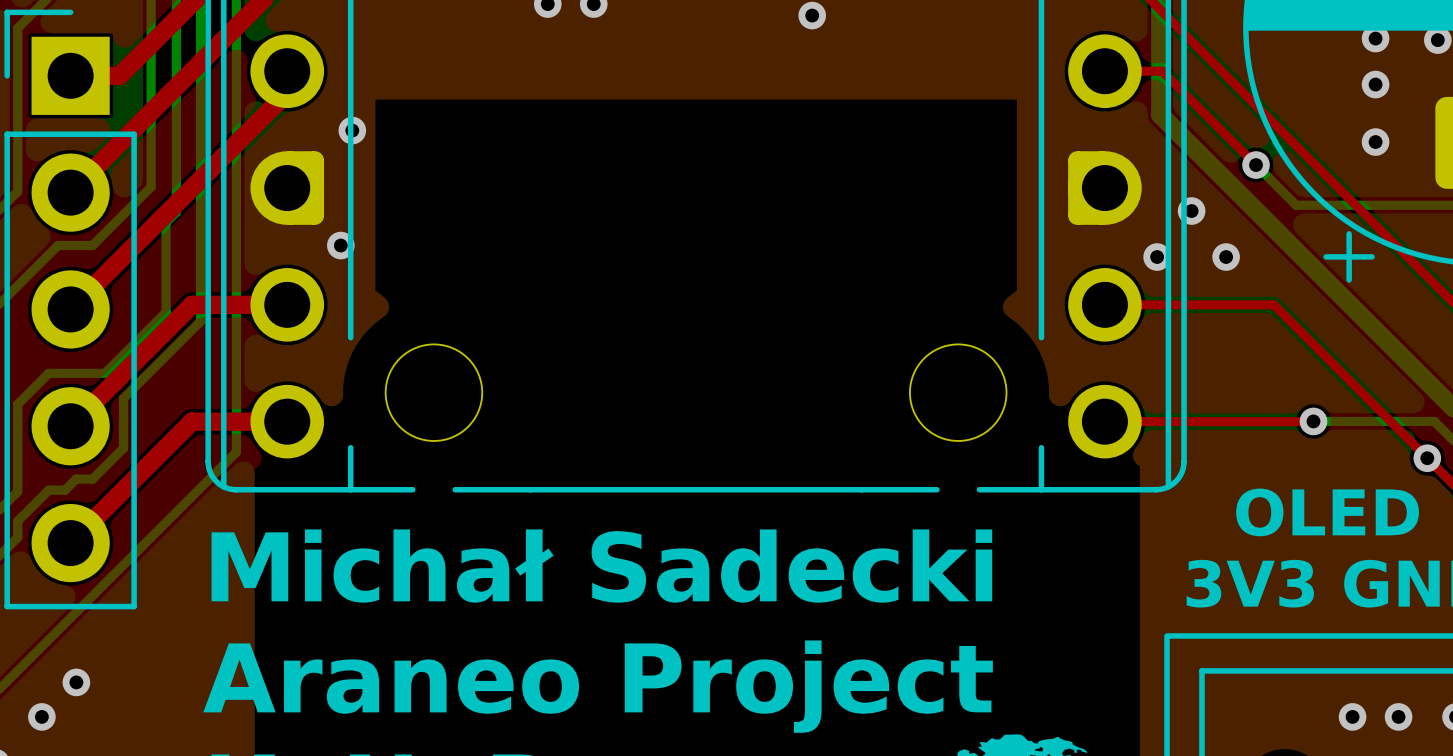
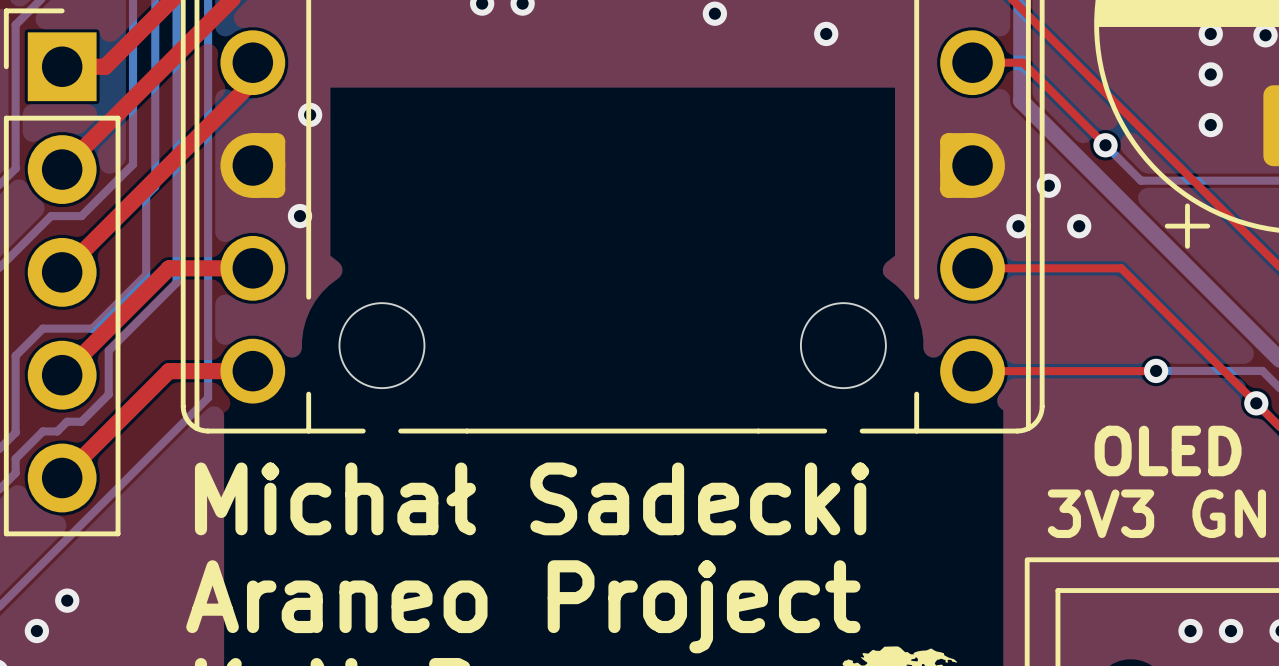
via: none -> (826, 33)

